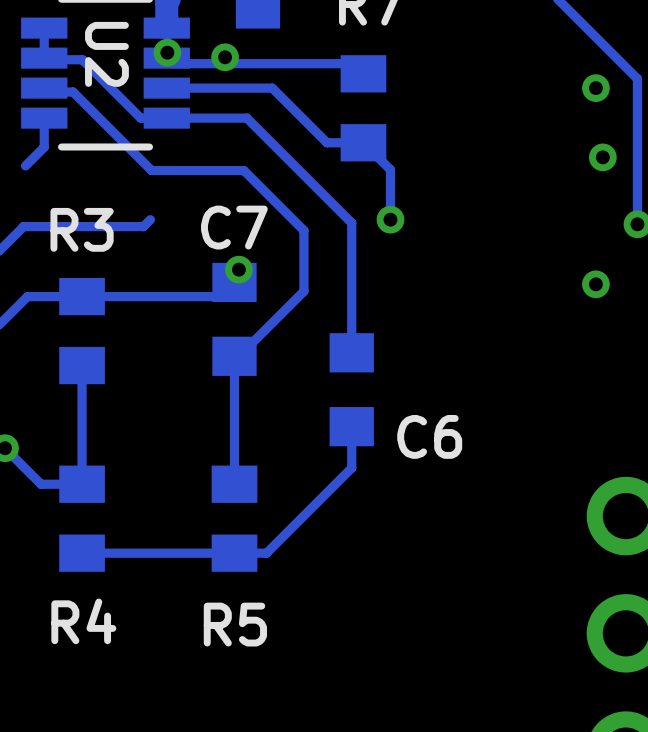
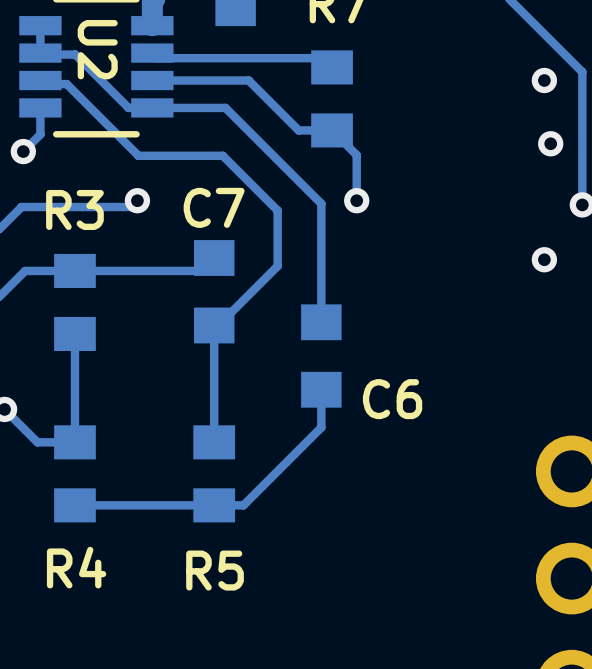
via: (167, 52) -> none
via: (225, 57) -> none
via: none -> (23, 151)
via: none -> (137, 200)
via: (238, 269) -> none

